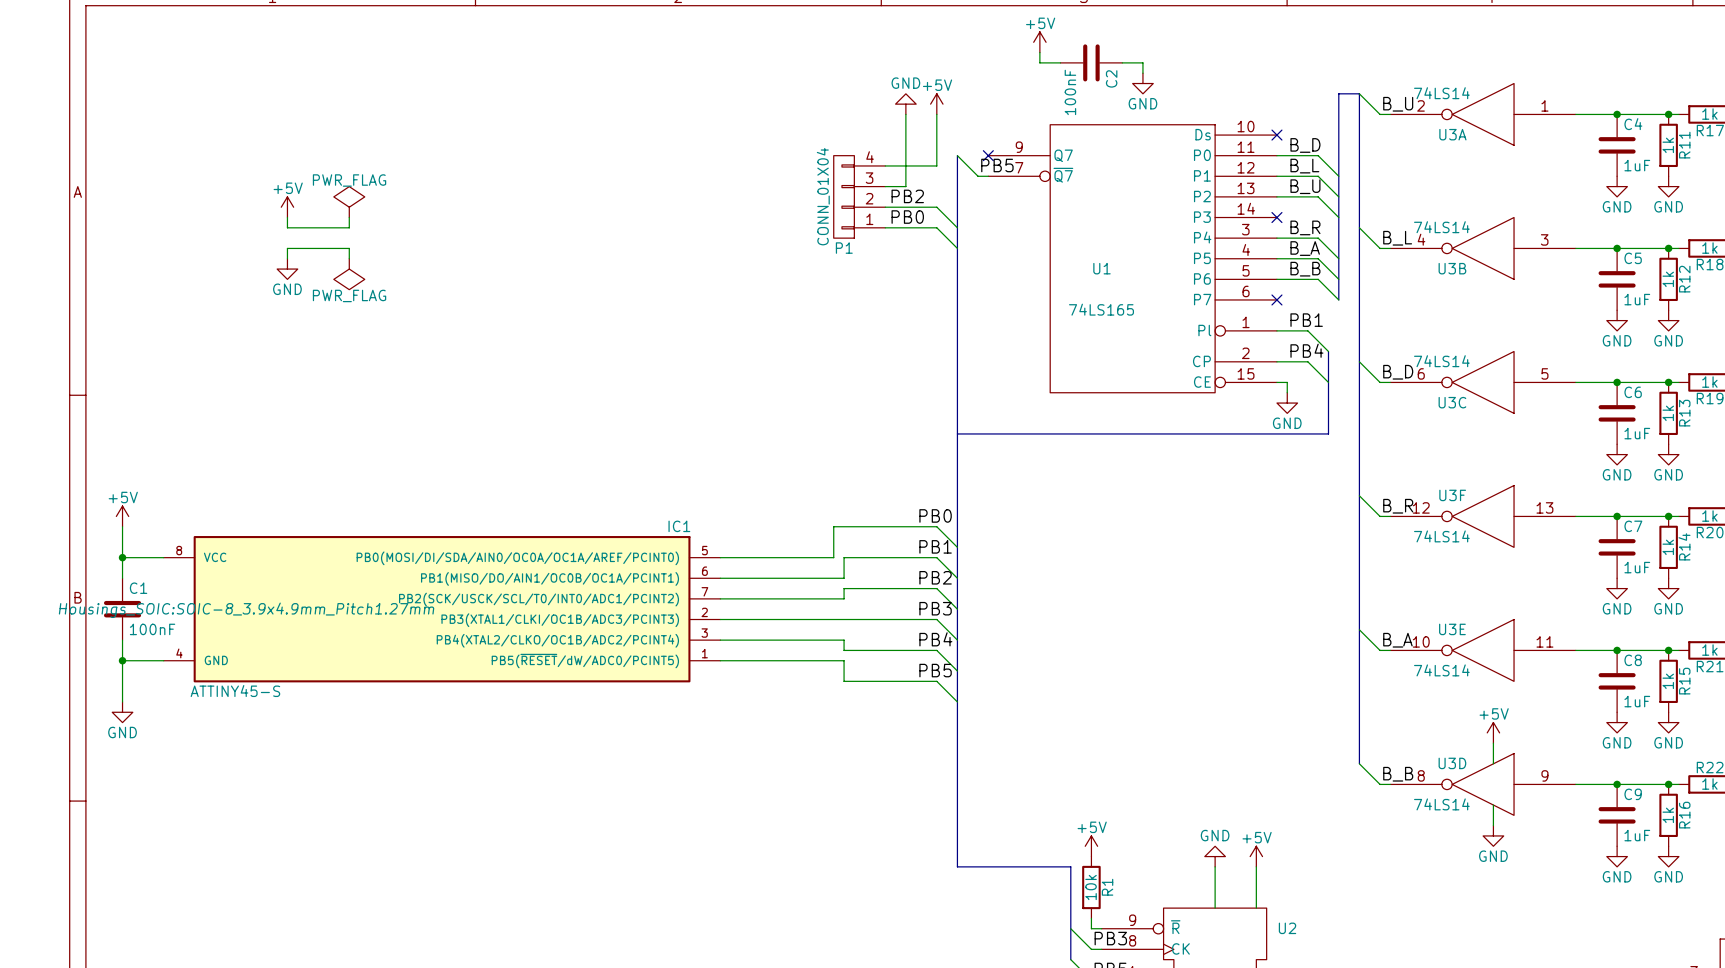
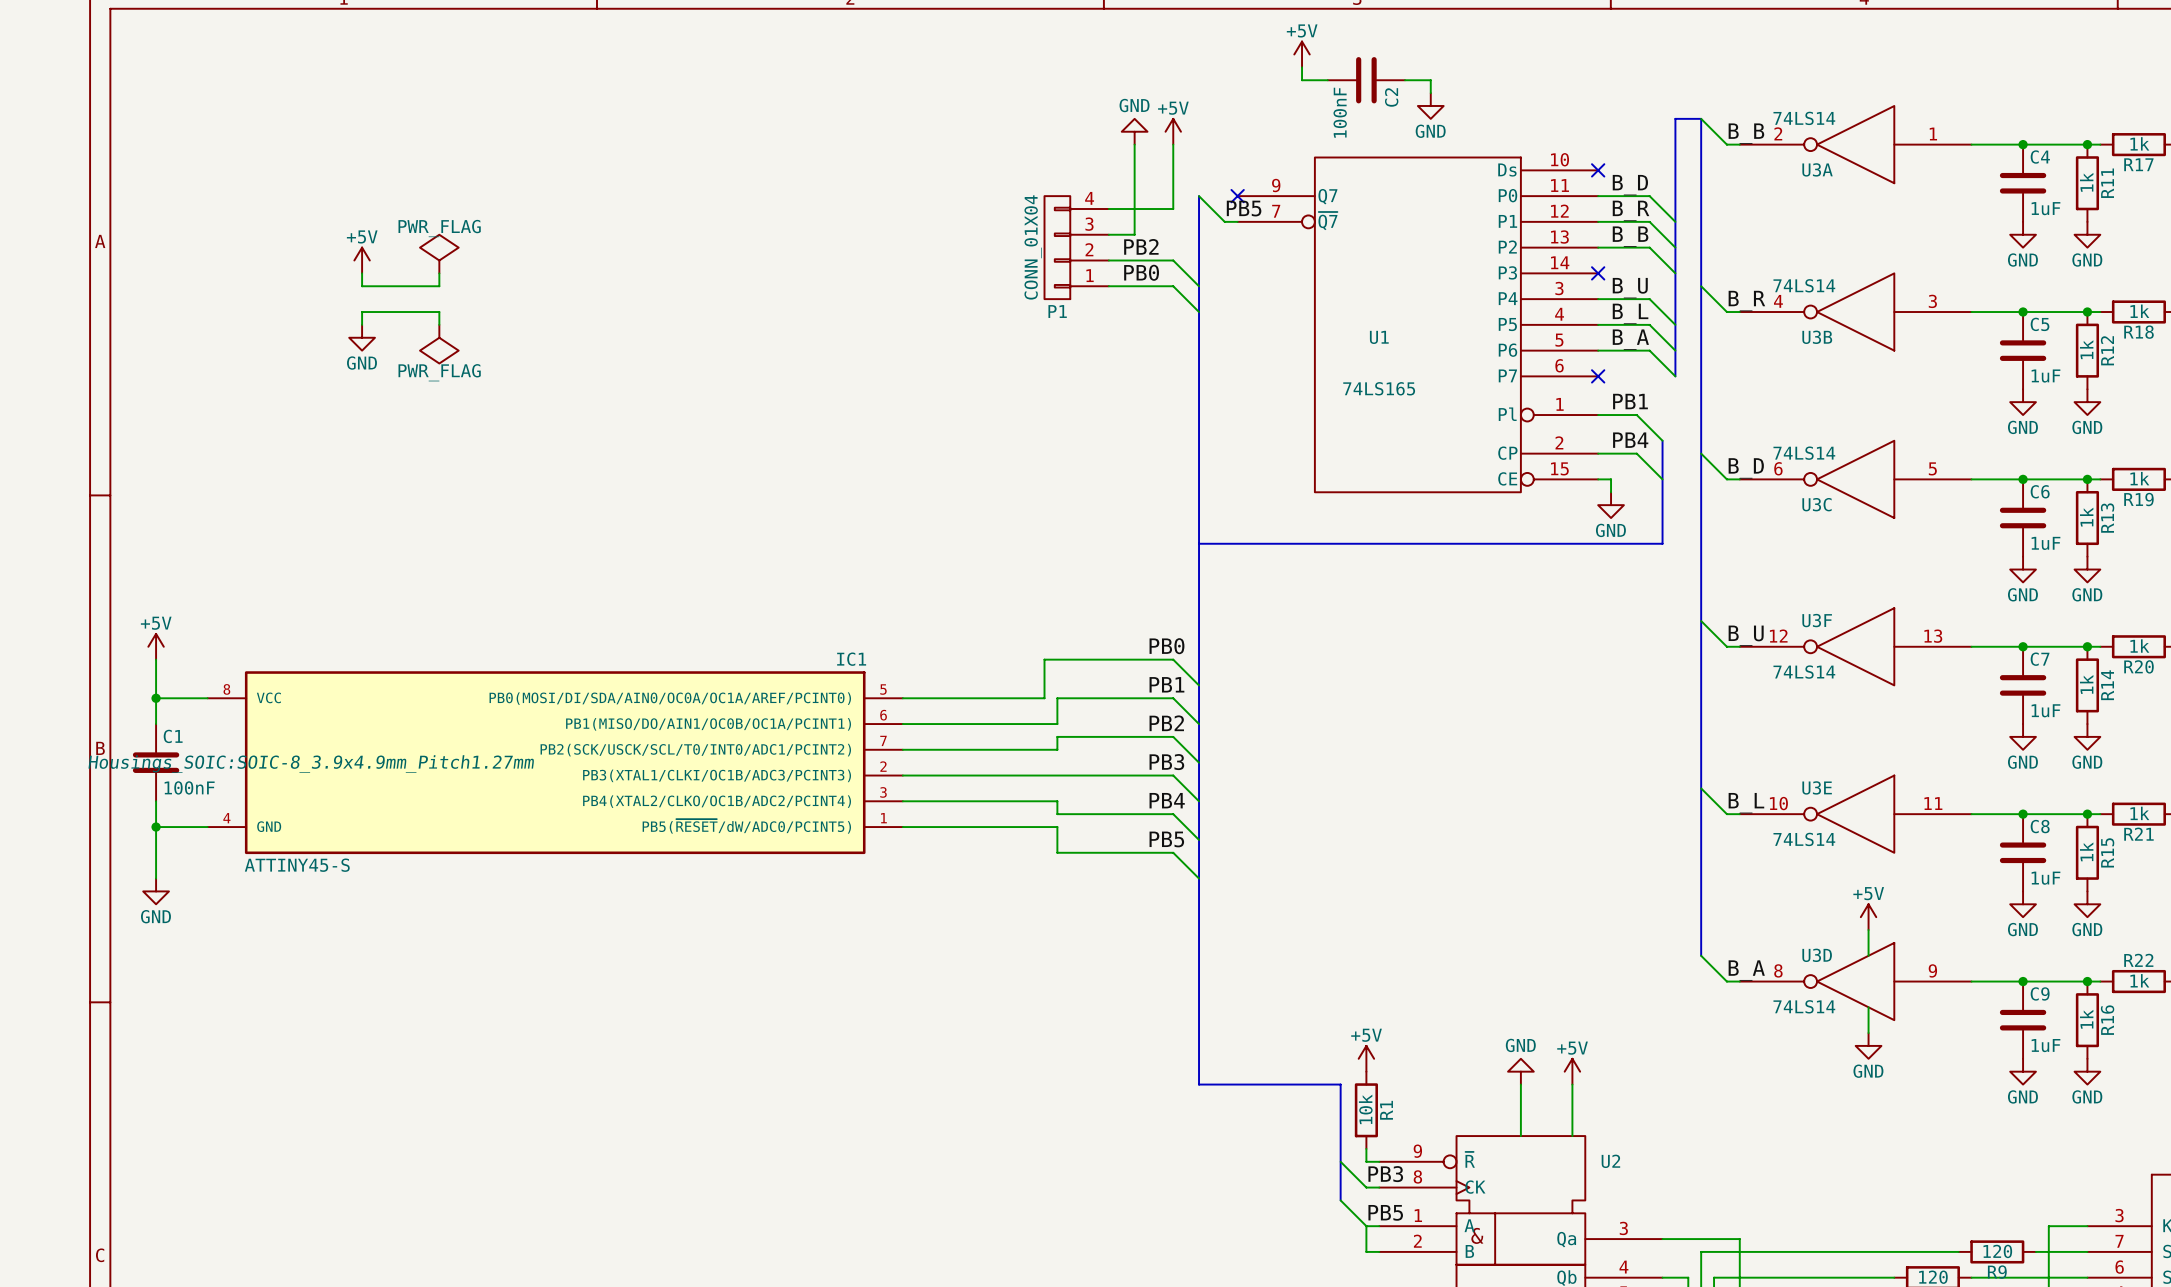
label: B_U (1398, 104) -> B_B (1746, 133)
label: B_L (1304, 166) -> B_R (1631, 210)
label: B_U (1305, 186) -> B_B (1630, 236)
label: B_R (1305, 227) -> B_U (1630, 288)
label: B_L (1397, 238) -> B_R (1746, 301)
label: B_A (1305, 248) -> B_L (1630, 313)
label: B_B (1305, 269) -> B_A (1630, 339)
label: B_R (1398, 506) -> B_U (1746, 635)
label: B_A (1397, 640) -> B_L (1746, 803)
label: B_B (1398, 774) -> B_A (1746, 970)

